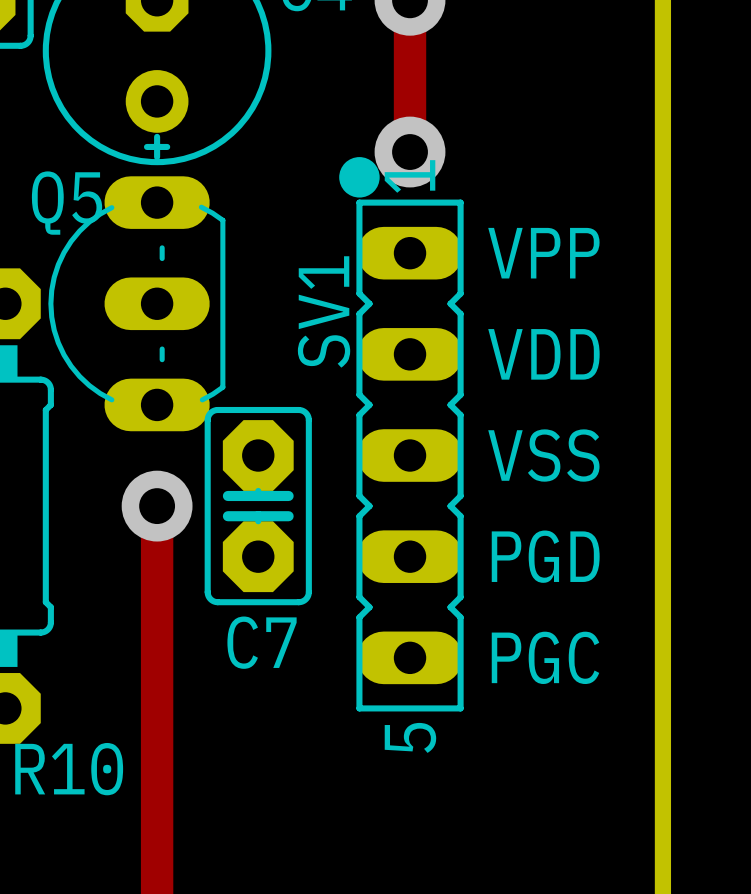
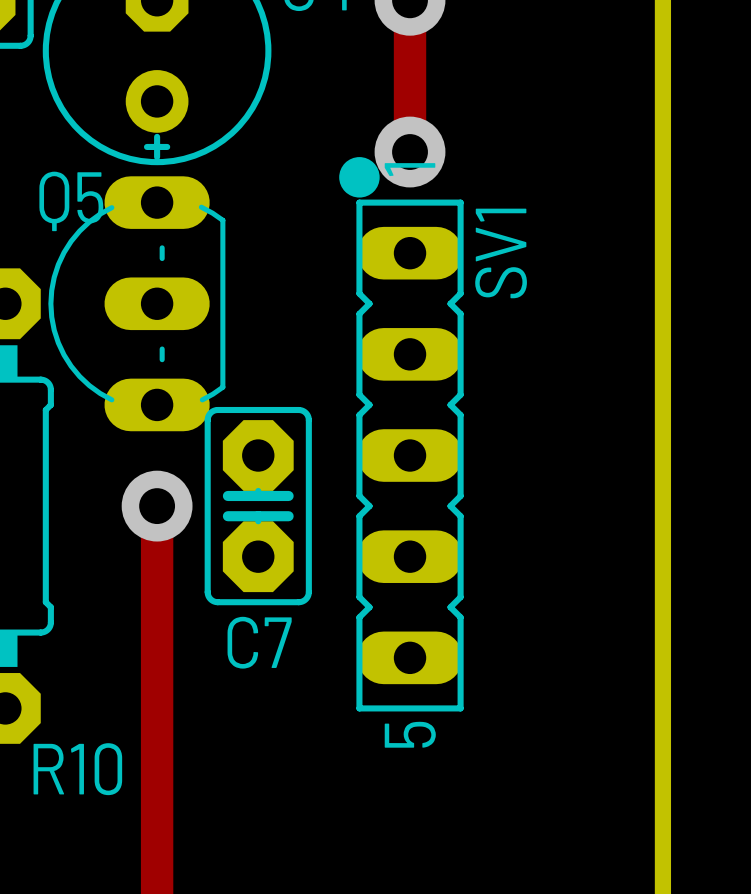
text: VPP (543, 253) -> none
SV1 name position: SV1 (324, 311) -> SV1 (501, 253)
text: VDD (543, 354) -> none
text: VSS (543, 455) -> none
text: PGD (545, 556) -> none
text: PGC (545, 657) -> none

